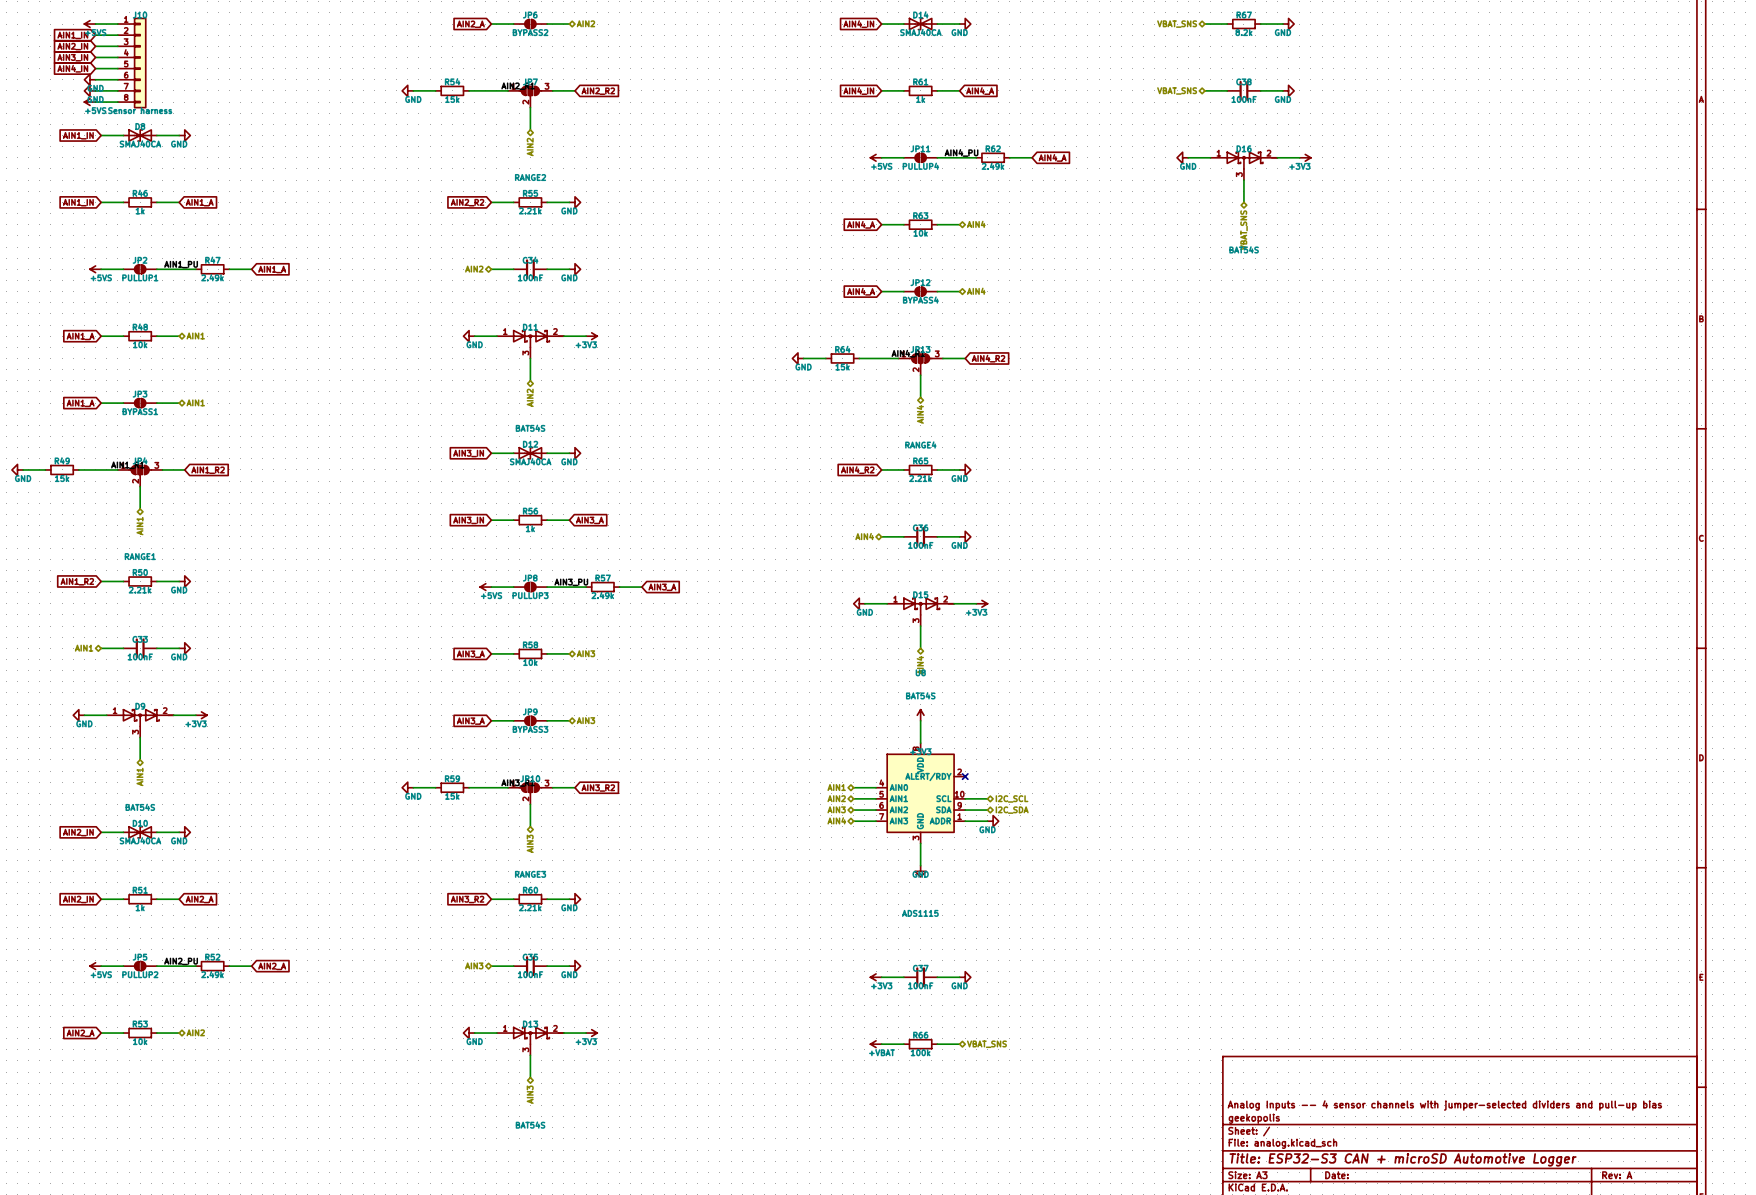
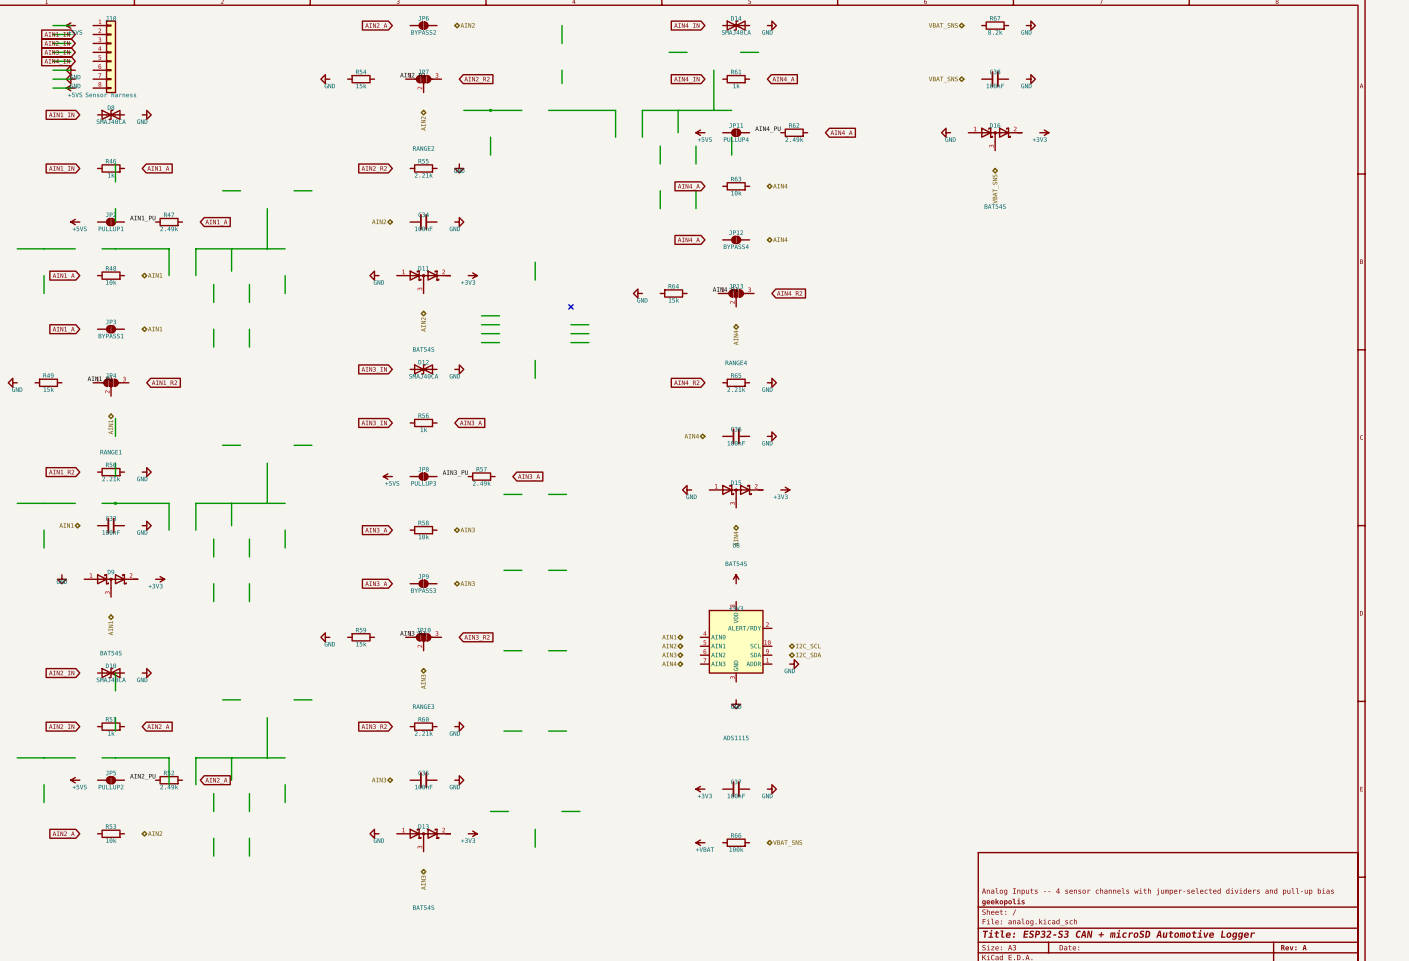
wire: (95, 24) (117, 24) -> (52, 25) (70, 25)
wire: (491, 24) (513, 24) -> none
wire: (547, 24) (569, 24) -> none
wire: none -> (562, 25) (562, 43)
wire: (881, 24) (903, 24) -> (669, 52) (687, 52)
wire: (937, 24) (959, 24) -> (740, 52) (758, 52)
wire: (1204, 24) (1227, 24) -> none
wire: (1260, 24) (1282, 24) -> none
wire: (95, 35) (117, 35) -> (52, 34) (70, 34)
wire: (95, 46) (117, 46) -> (52, 43) (70, 43)
wire: (95, 57) (117, 57) -> (52, 52) (70, 52)
wire: (95, 68) (117, 68) -> (52, 61) (70, 61)
wire: (95, 79) (117, 79) -> (52, 70) (70, 70)
wire: none -> (562, 70) (562, 83)
wire: none -> (713, 70) (713, 110)
wire: (95, 90) (117, 90) -> (52, 79) (70, 79)
wire: (413, 90) (435, 90) -> none
wire: (469, 90) (508, 90) -> none
wire: (552, 90) (574, 90) -> none
wire: (881, 90) (903, 90) -> none
wire: (937, 90) (959, 90) -> none
wire: (1204, 90) (1227, 90) -> none
wire: (1260, 90) (1282, 90) -> none
wire: (95, 102) (117, 102) -> (52, 88) (70, 88)
wire: (530, 107) (530, 129) -> (490, 137) (490, 155)
wire: none -> (463, 110) (521, 110)
junction: none -> (490, 110)
wire: none -> (548, 110) (615, 110) (615, 137)
wire: none -> (678, 110) (678, 132)
wire: none -> (731, 110) (642, 110) (642, 137)
wire: (101, 135) (123, 135) -> none
wire: (156, 135) (179, 135) -> none
wire: (881, 157) (903, 157) -> none
wire: (937, 157) (976, 157) -> none
wire: (1009, 157) (1032, 157) -> none
wire: (1188, 157) (1210, 157) -> none
wire: (1277, 157) (1299, 157) -> none
wire: none -> (731, 137) (731, 155)
wire: none -> (660, 146) (660, 163)
wire: none -> (695, 146) (695, 163)
wire: (1243, 180) (1243, 202) -> none
wire: none -> (115, 163) (115, 181)
wire: (101, 202) (123, 202) -> none
wire: (156, 202) (179, 202) -> none
wire: (491, 202) (513, 202) -> none
wire: (547, 202) (569, 202) -> none
power symbol rotation: 0° (574, 202) -> 90° clockwise (459, 168)
wire: (881, 224) (903, 224) -> none
wire: (937, 224) (959, 224) -> none
wire: none -> (294, 190) (311, 190)
wire: none -> (660, 190) (660, 208)
wire: none -> (695, 190) (695, 208)
wire: none -> (115, 208) (115, 222)
wire: none -> (267, 208) (267, 248)
wire: (101, 269) (123, 269) -> none
wire: (156, 269) (195, 269) -> none
wire: (229, 269) (251, 269) -> (222, 190) (240, 190)
wire: (491, 269) (513, 269) -> none
wire: (547, 269) (569, 269) -> none
wire: (881, 291) (903, 291) -> none
wire: (937, 291) (959, 291) -> none
wire: none -> (17, 248) (75, 248)
wire: none -> (102, 248) (169, 248) (169, 275)
wire: none -> (231, 248) (231, 271)
wire: none -> (285, 248) (195, 248) (195, 275)
wire: none -> (535, 262) (535, 280)
wire: none -> (44, 275) (44, 293)
wire: (101, 336) (123, 336) -> none
wire: (156, 336) (179, 336) -> none
wire: none -> (285, 275) (285, 293)
wire: (474, 336) (496, 336) -> none
wire: (563, 336) (586, 336) -> (481, 315) (499, 315)
wire: none -> (213, 284) (213, 302)
wire: none -> (249, 284) (249, 302)
wire: (530, 358) (530, 380) -> none
wire: (803, 358) (825, 358) -> (570, 324) (588, 324)
wire: (859, 358) (898, 358) -> none
wire: (942, 358) (965, 358) -> none
no-connect mark: none -> (570, 306)
wire: (920, 375) (920, 397) -> none
wire: none -> (481, 324) (499, 324)
wire: (101, 403) (123, 403) -> none
wire: (156, 403) (179, 403) -> none
wire: none -> (213, 329) (213, 347)
wire: none -> (249, 329) (249, 347)
wire: none -> (481, 333) (499, 333)
wire: none -> (570, 333) (588, 333)
wire: none -> (570, 342) (588, 342)
wire: none -> (535, 360) (535, 378)
wire: (491, 453) (513, 453) -> none
wire: (547, 453) (569, 453) -> (481, 342) (499, 342)
wire: (23, 469) (45, 469) -> none
wire: (78, 469) (117, 469) -> none
wire: (162, 469) (184, 469) -> none
wire: (881, 469) (903, 469) -> none
wire: (937, 469) (959, 469) -> none
wire: (140, 486) (140, 509) -> (115, 418) (115, 436)
wire: (491, 520) (513, 520) -> none
wire: (547, 520) (569, 520) -> none
wire: (881, 536) (903, 536) -> none
wire: (937, 536) (959, 536) -> none
wire: none -> (222, 445) (240, 445)
wire: none -> (294, 445) (311, 445)
wire: none -> (115, 463) (115, 476)
wire: none -> (267, 463) (267, 503)
wire: (101, 581) (123, 581) -> none
wire: (156, 581) (179, 581) -> none
wire: (491, 587) (513, 587) -> none
wire: (547, 587) (586, 587) -> none
wire: (619, 587) (641, 587) -> (503, 494) (521, 494)
wire: (864, 603) (887, 603) -> none
wire: (954, 603) (976, 603) -> none
wire: none -> (548, 494) (566, 494)
wire: none -> (17, 503) (75, 503)
wire: none -> (102, 503) (169, 503) (169, 530)
junction: none -> (115, 503)
wire: none -> (231, 503) (231, 525)
wire: none -> (285, 503) (195, 503) (195, 530)
wire: (920, 626) (920, 648) -> none
wire: (101, 648) (123, 648) -> none
wire: (156, 648) (179, 648) -> none
wire: none -> (44, 530) (44, 548)
wire: none -> (285, 530) (285, 548)
wire: (491, 653) (513, 653) -> none
wire: (547, 653) (569, 653) -> none
wire: none -> (213, 539) (213, 556)
wire: none -> (249, 539) (249, 556)
wire: none -> (548, 570) (566, 570)
power symbol rotation: 0° (78, 715) -> 90° counterclockwise (61, 579)
wire: (84, 715) (106, 715) -> none
wire: (173, 715) (195, 715) -> none
wire: none -> (213, 583) (213, 601)
wire: none -> (249, 583) (249, 601)
wire: (491, 720) (513, 720) -> none
wire: (547, 720) (569, 720) -> (503, 570) (521, 570)
wire: (920, 720) (920, 743) -> none
wire: (140, 737) (140, 759) -> (115, 673) (115, 690)
no-connect mark: (965, 776) -> none
wire: (413, 787) (435, 787) -> (294, 699) (311, 699)
wire: (469, 787) (508, 787) -> none
wire: (552, 787) (574, 787) -> (503, 650) (521, 650)
wire: (853, 787) (876, 787) -> none
wire: (853, 798) (876, 798) -> none
wire: (965, 798) (987, 798) -> none
wire: (530, 804) (530, 826) -> none
wire: none -> (548, 650) (566, 650)
wire: (853, 810) (876, 810) -> none
wire: (965, 810) (987, 810) -> none
wire: (853, 821) (876, 821) -> none
wire: (965, 821) (987, 821) -> none
wire: (101, 832) (123, 832) -> none
wire: (156, 832) (179, 832) -> none
wire: (920, 843) (920, 865) -> none
wire: none -> (222, 699) (240, 699)
wire: none -> (115, 717) (115, 731)
wire: none -> (267, 717) (267, 757)
wire: (101, 899) (123, 899) -> none
wire: (156, 899) (179, 899) -> none
wire: (491, 899) (513, 899) -> none
wire: (547, 899) (569, 899) -> (503, 731) (521, 731)
wire: none -> (548, 731) (566, 731)
wire: none -> (17, 757) (75, 757)
wire: none -> (102, 757) (169, 757) (169, 784)
wire: none -> (231, 757) (231, 780)
wire: none -> (285, 757) (195, 757) (195, 784)
wire: (101, 966) (123, 966) -> none
wire: (156, 966) (195, 966) -> none
wire: (229, 966) (251, 966) -> none
wire: (491, 966) (513, 966) -> none
wire: (547, 966) (569, 966) -> none
wire: none -> (44, 784) (44, 802)
wire: none -> (285, 784) (285, 802)
wire: (881, 977) (903, 977) -> none
wire: (937, 977) (959, 977) -> none
wire: none -> (213, 793) (213, 811)
wire: none -> (249, 793) (249, 811)
wire: none -> (562, 811) (579, 811)
wire: none -> (535, 829) (535, 847)
wire: (101, 1033) (123, 1033) -> none
wire: (156, 1033) (179, 1033) -> none
wire: (474, 1033) (496, 1033) -> none
wire: (563, 1033) (586, 1033) -> (490, 811) (508, 811)
wire: none -> (213, 838) (213, 856)
wire: none -> (249, 838) (249, 856)
wire: (881, 1044) (903, 1044) -> none
wire: (937, 1044) (959, 1044) -> none
wire: (530, 1055) (530, 1077) -> none

